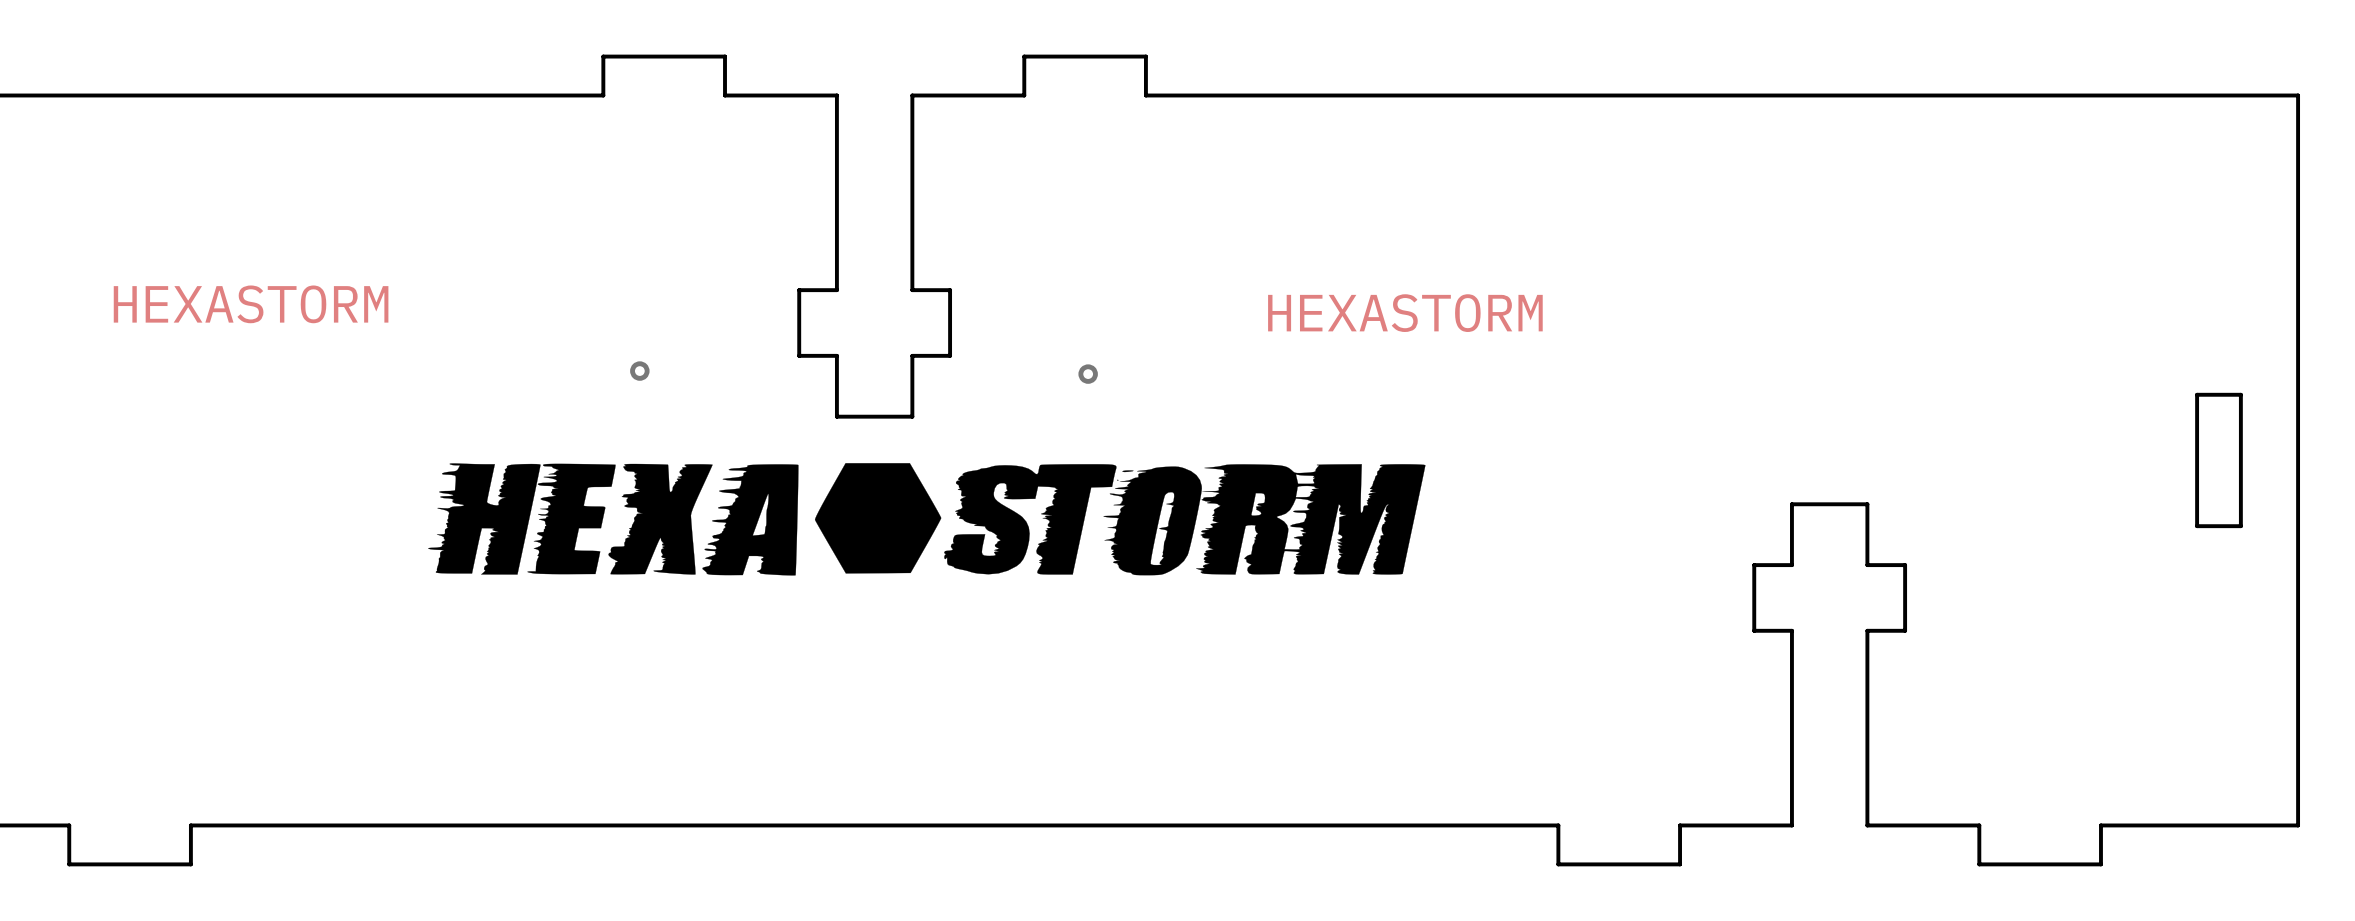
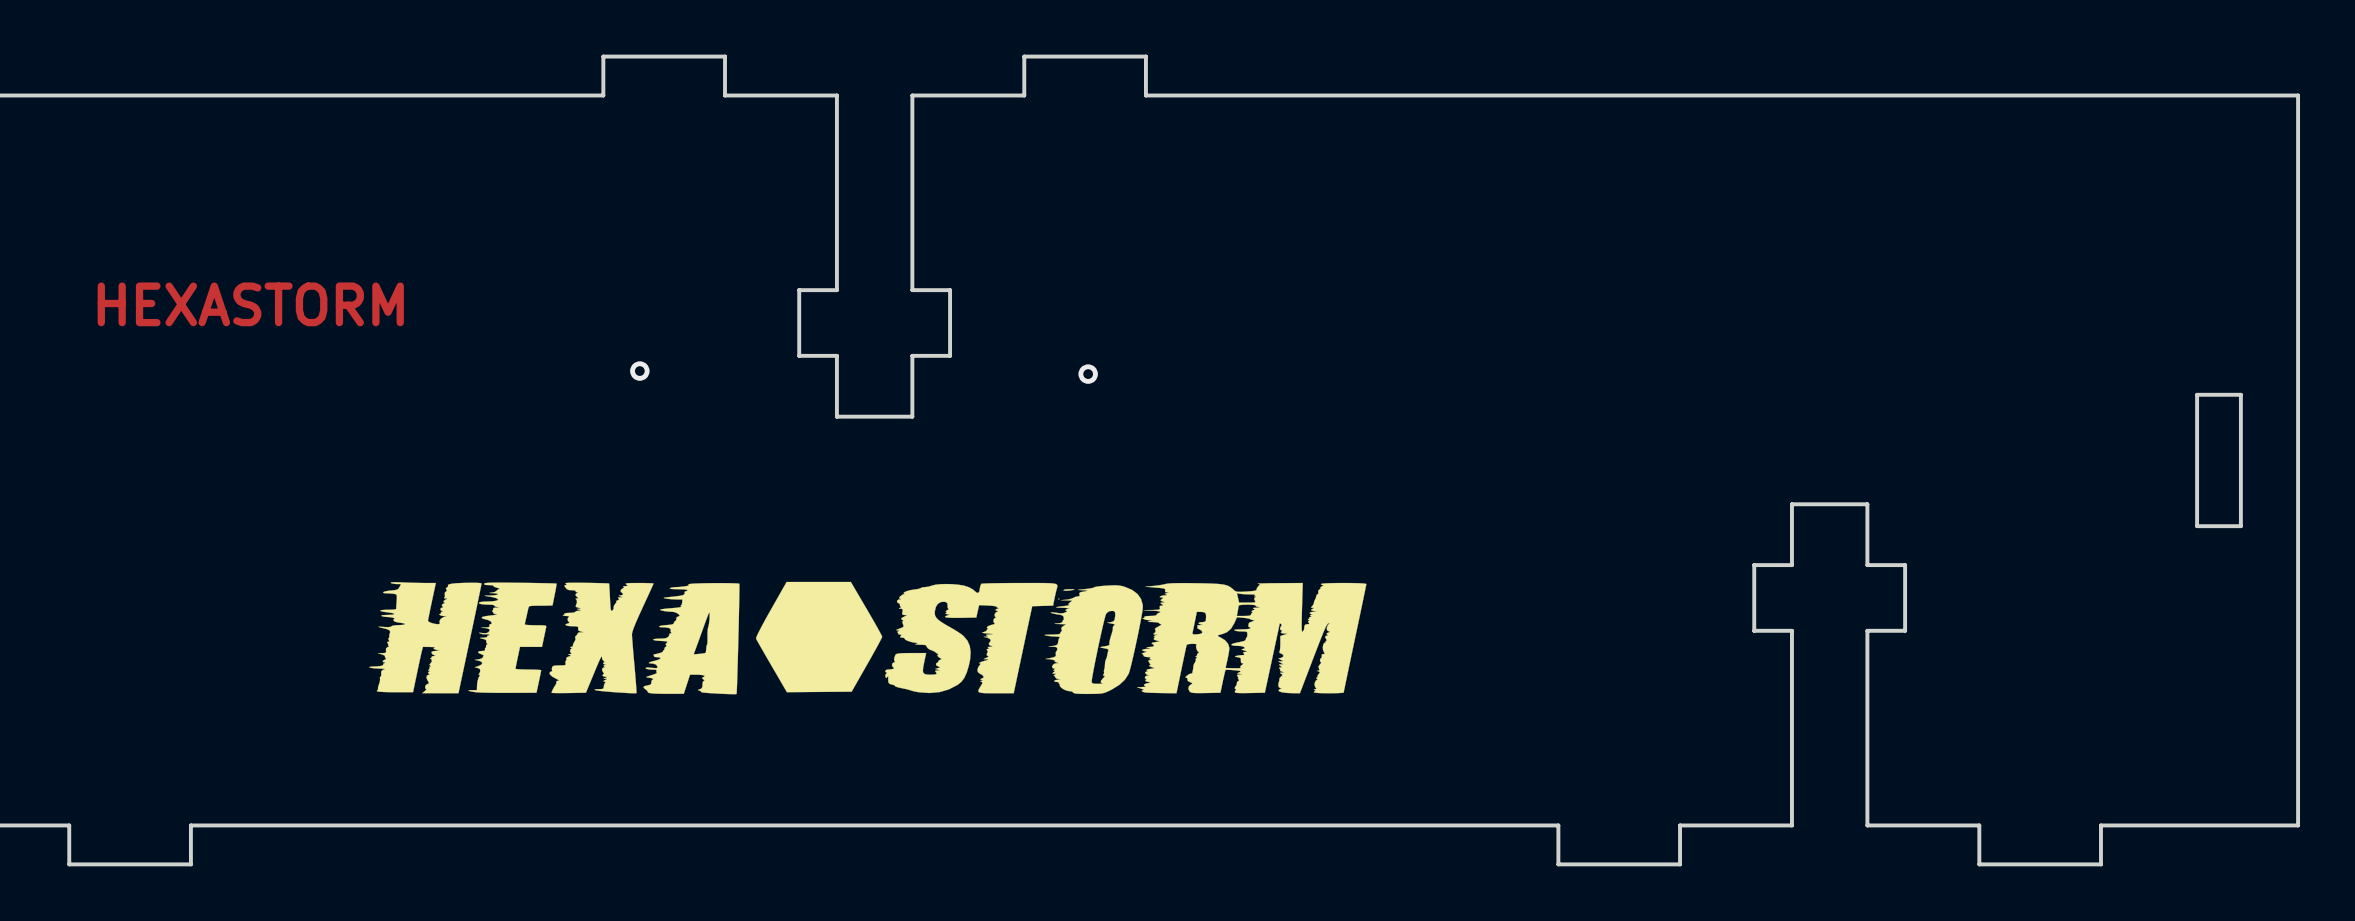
text: HEXASTORM (1405, 313) -> none
drawing position: (926, 519) -> (867, 638)

